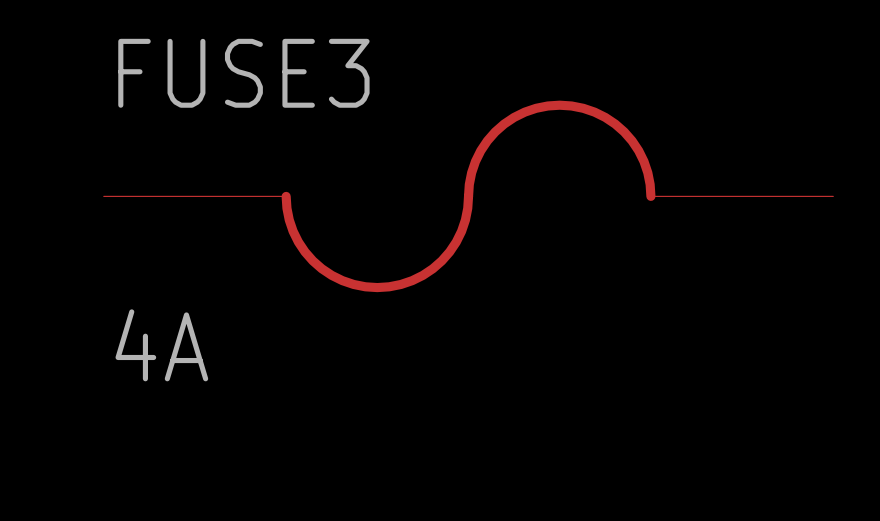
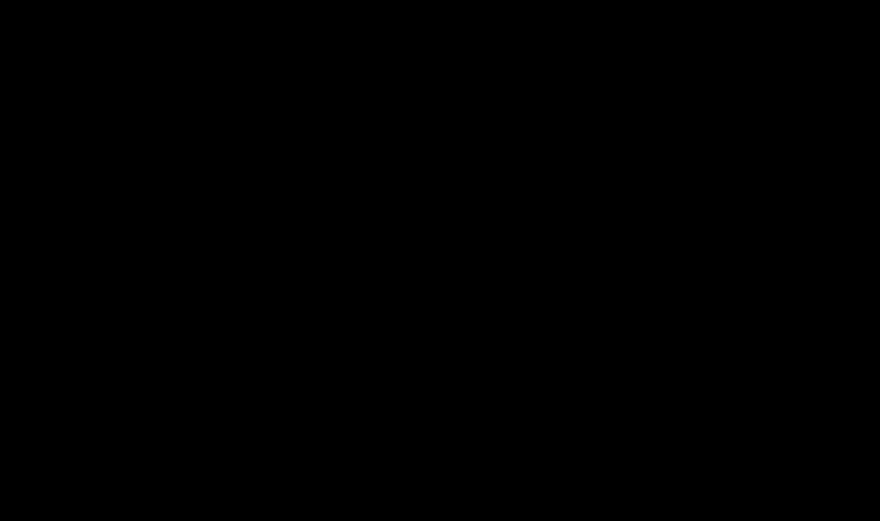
FUSE3: 4A (468, 196) -> none

